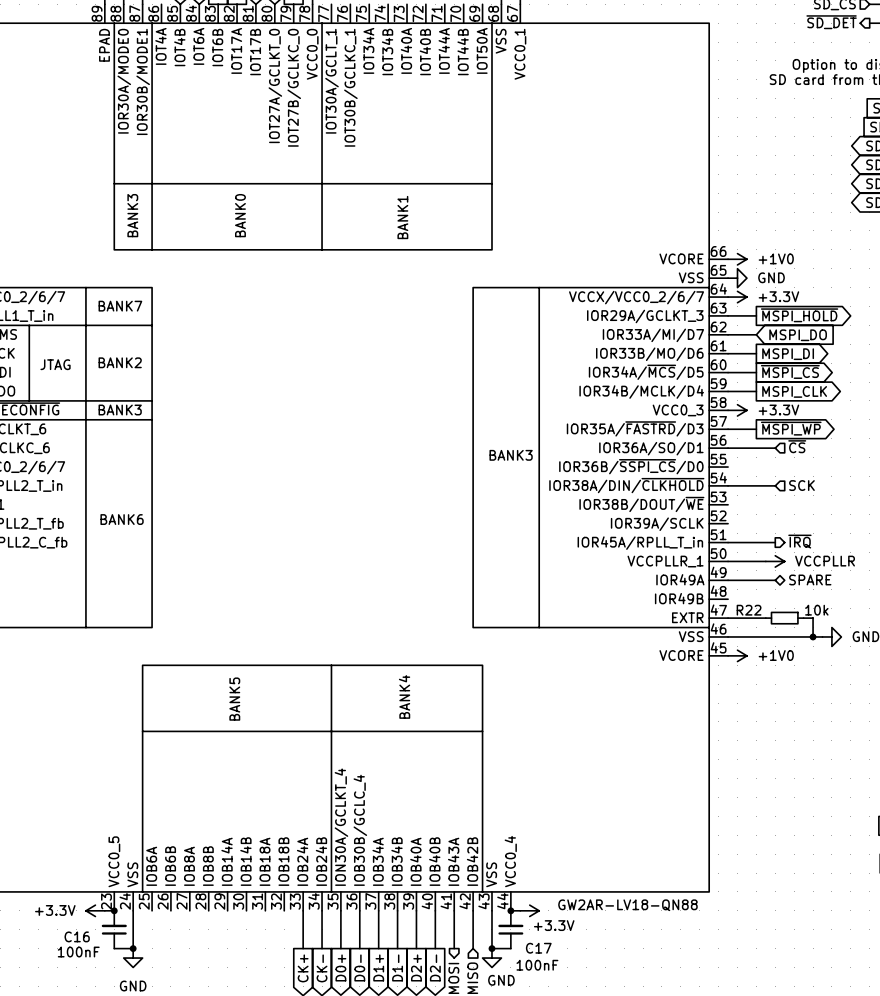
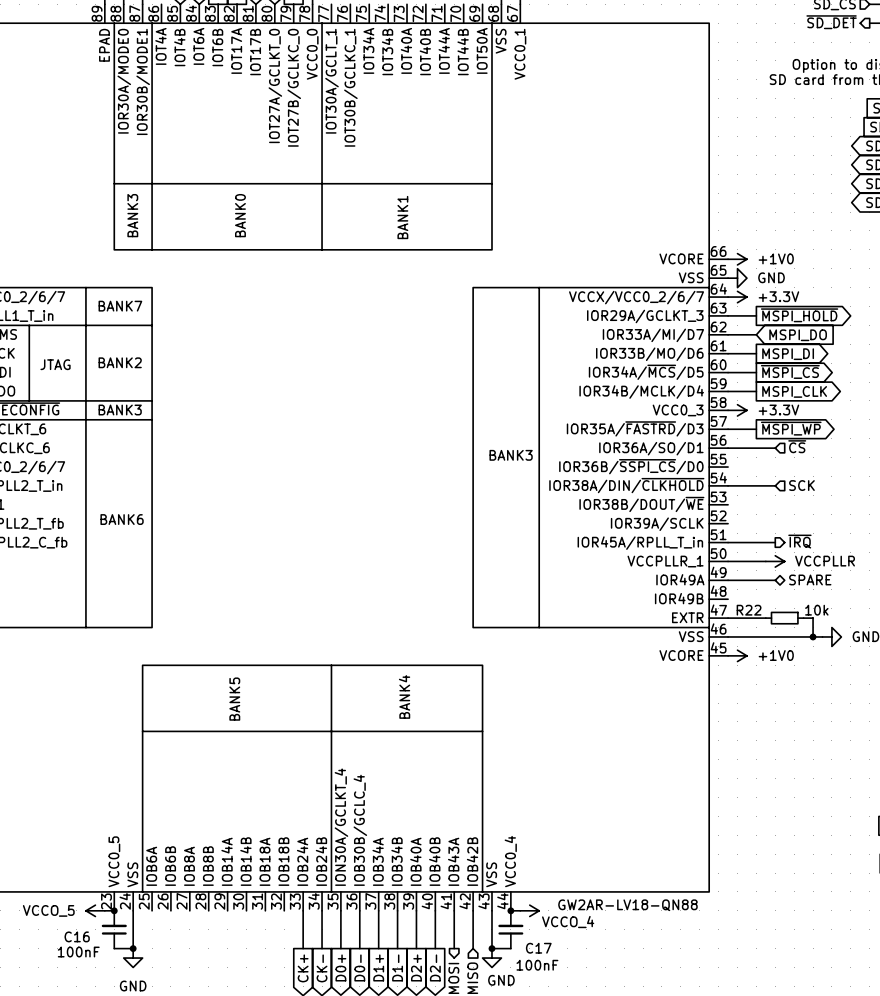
power symbol: +3.3V (95, 910) -> VCCO_5 (95, 910)
power symbol: +3.3V (529, 910) -> VCCO_4 (529, 910)

